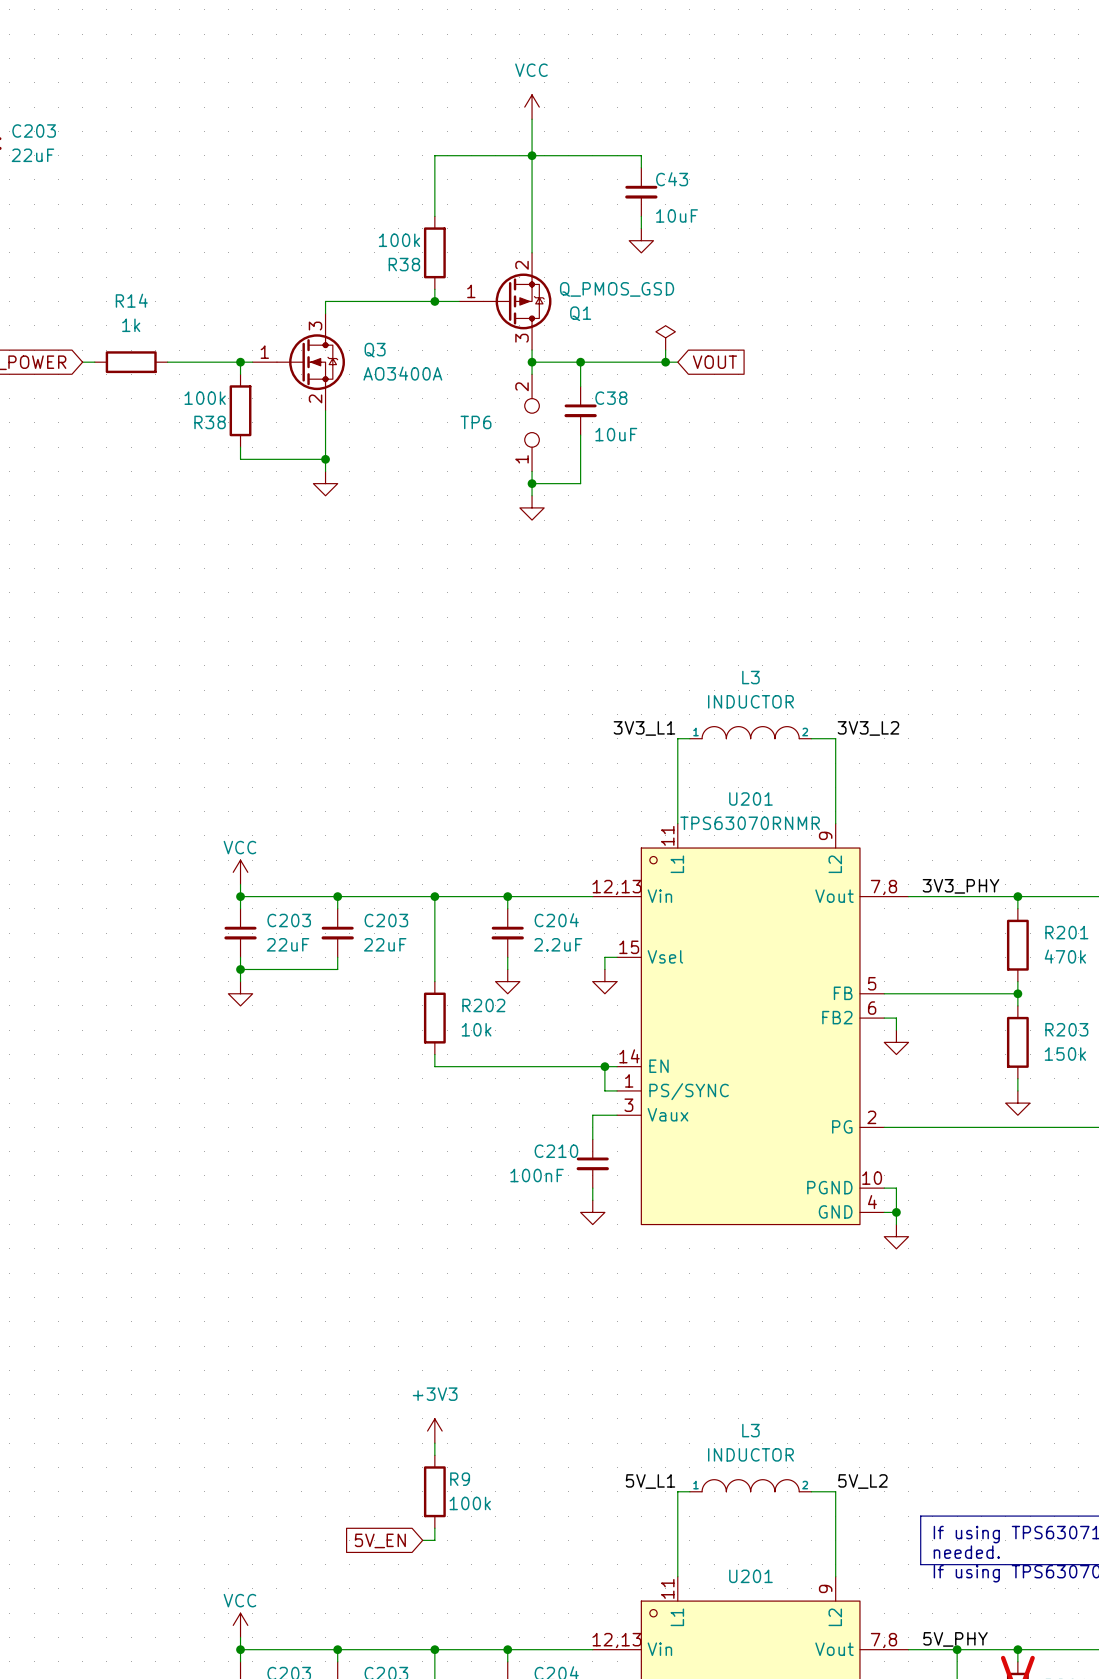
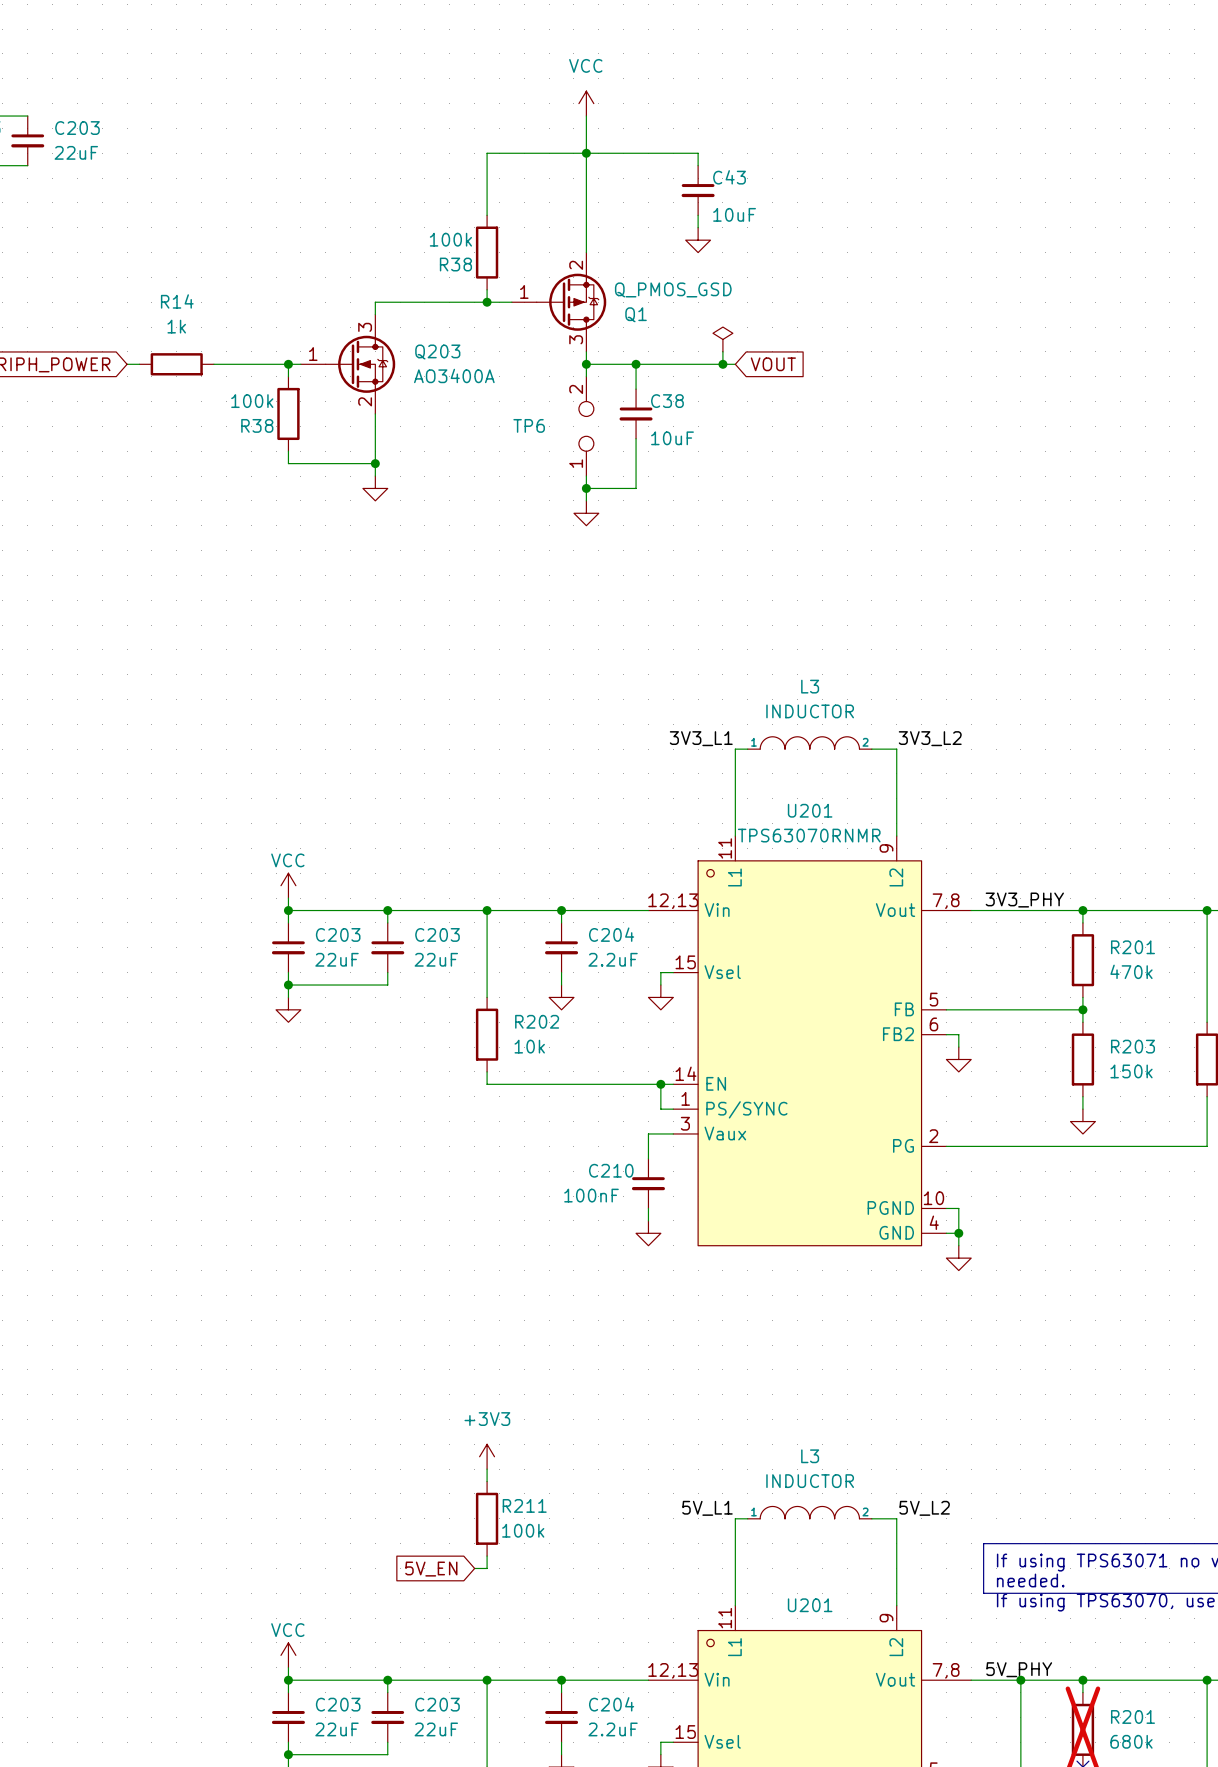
Q3 name: Q3 (375, 350) -> Q203 (437, 352)
R9 name: R9 (460, 1479) -> R211 (524, 1505)

